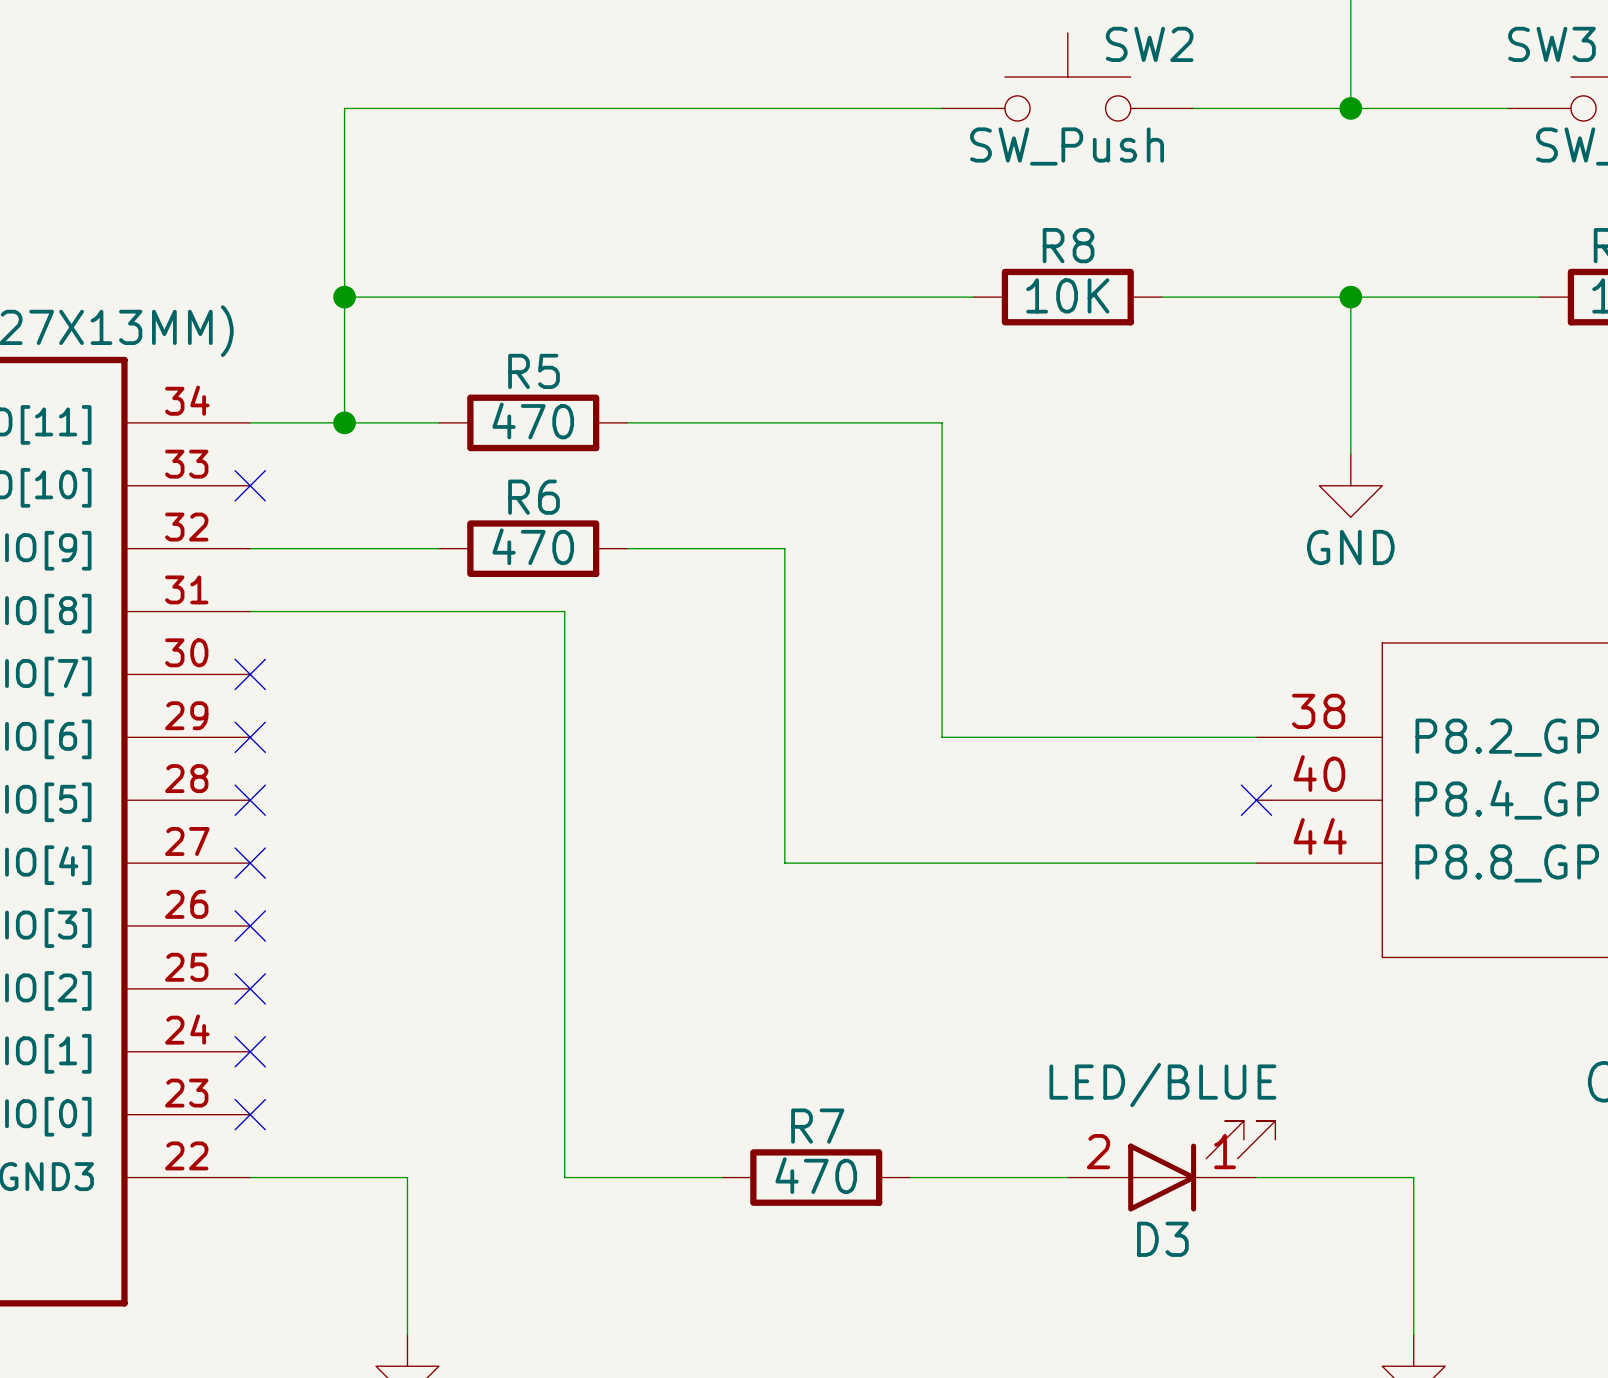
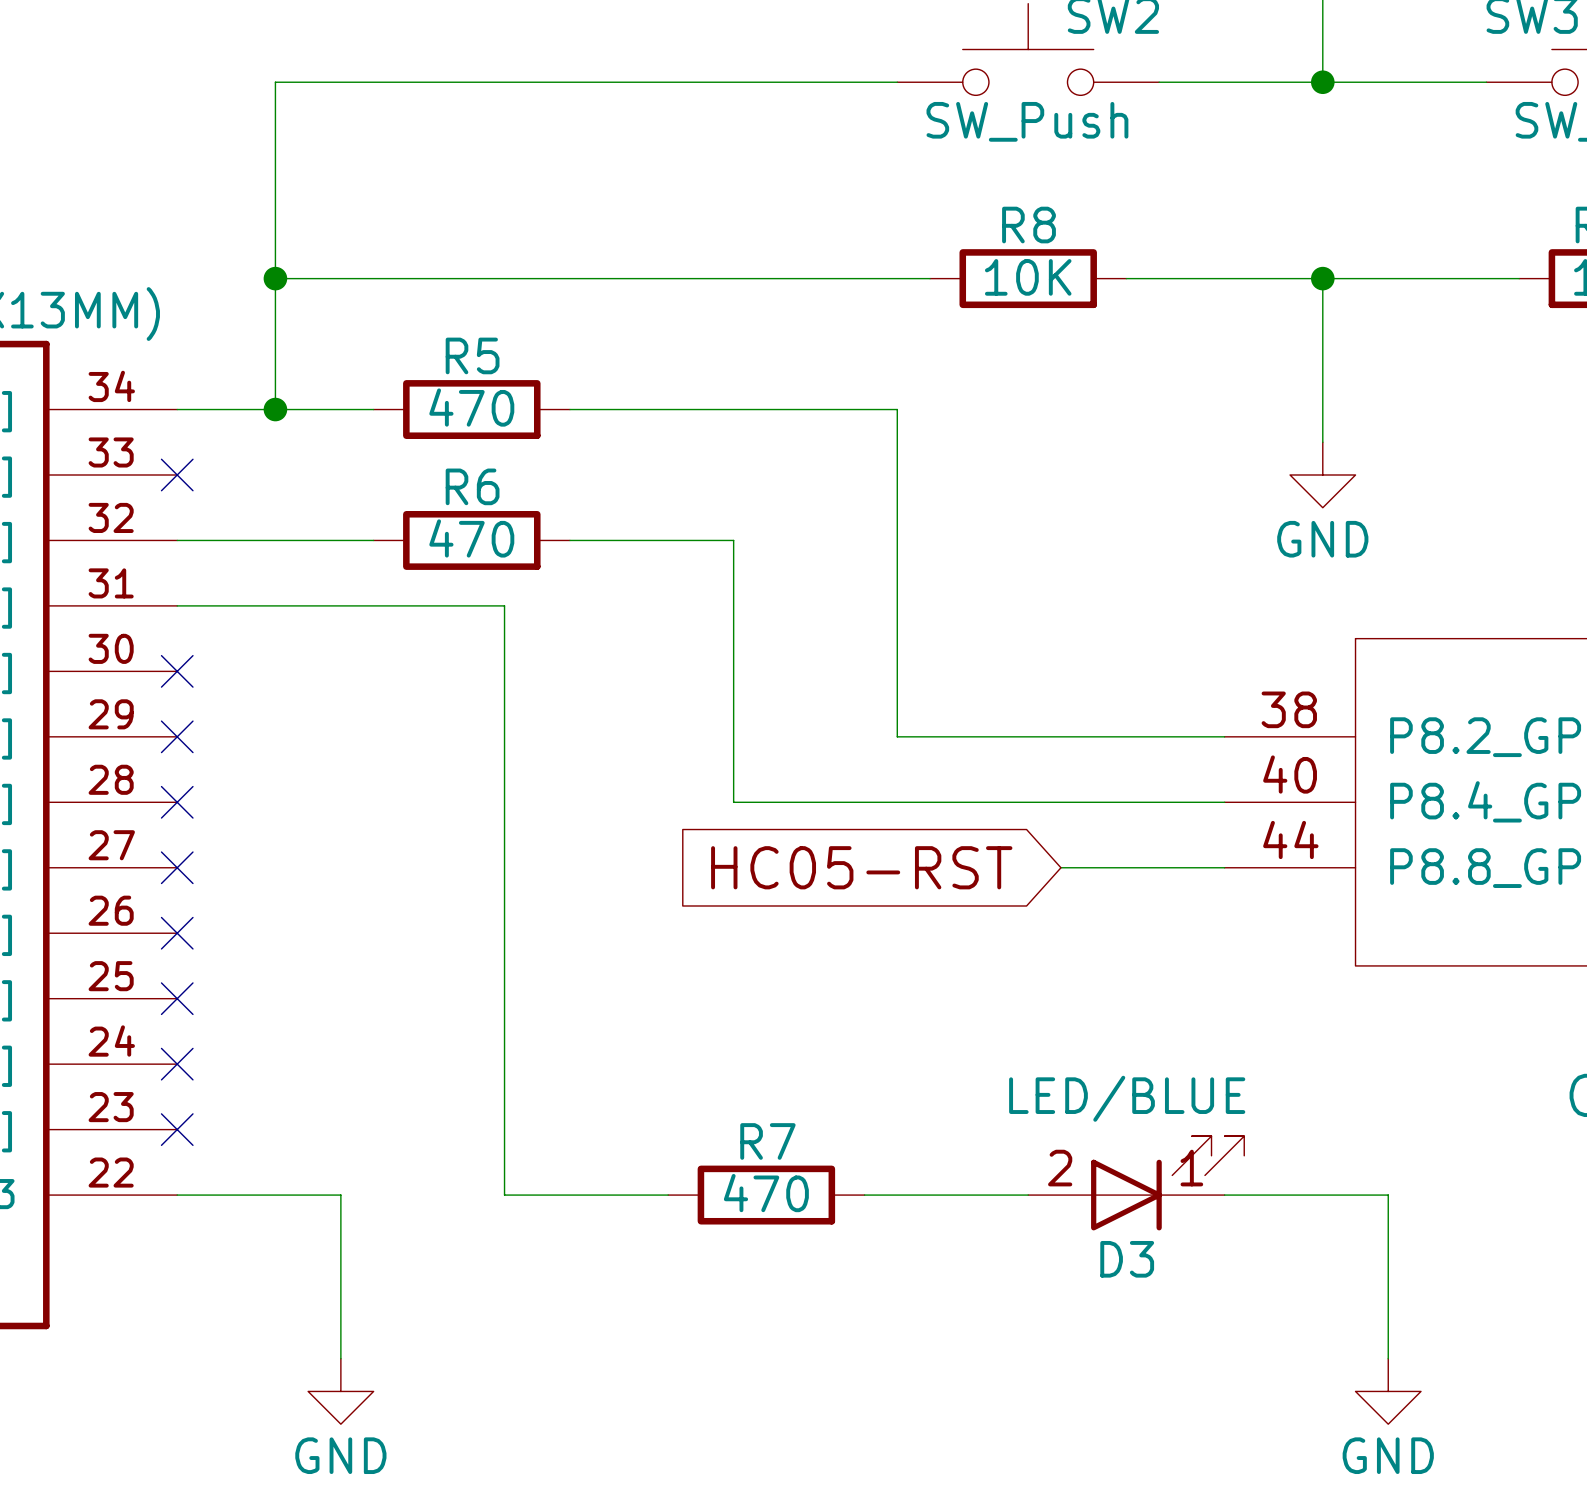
wire: (784, 800) (784, 863) (1099, 863) -> (733, 802) (1224, 802)
no-connect mark: (1256, 800) -> none
global label: none -> HC05-RST (861, 867)

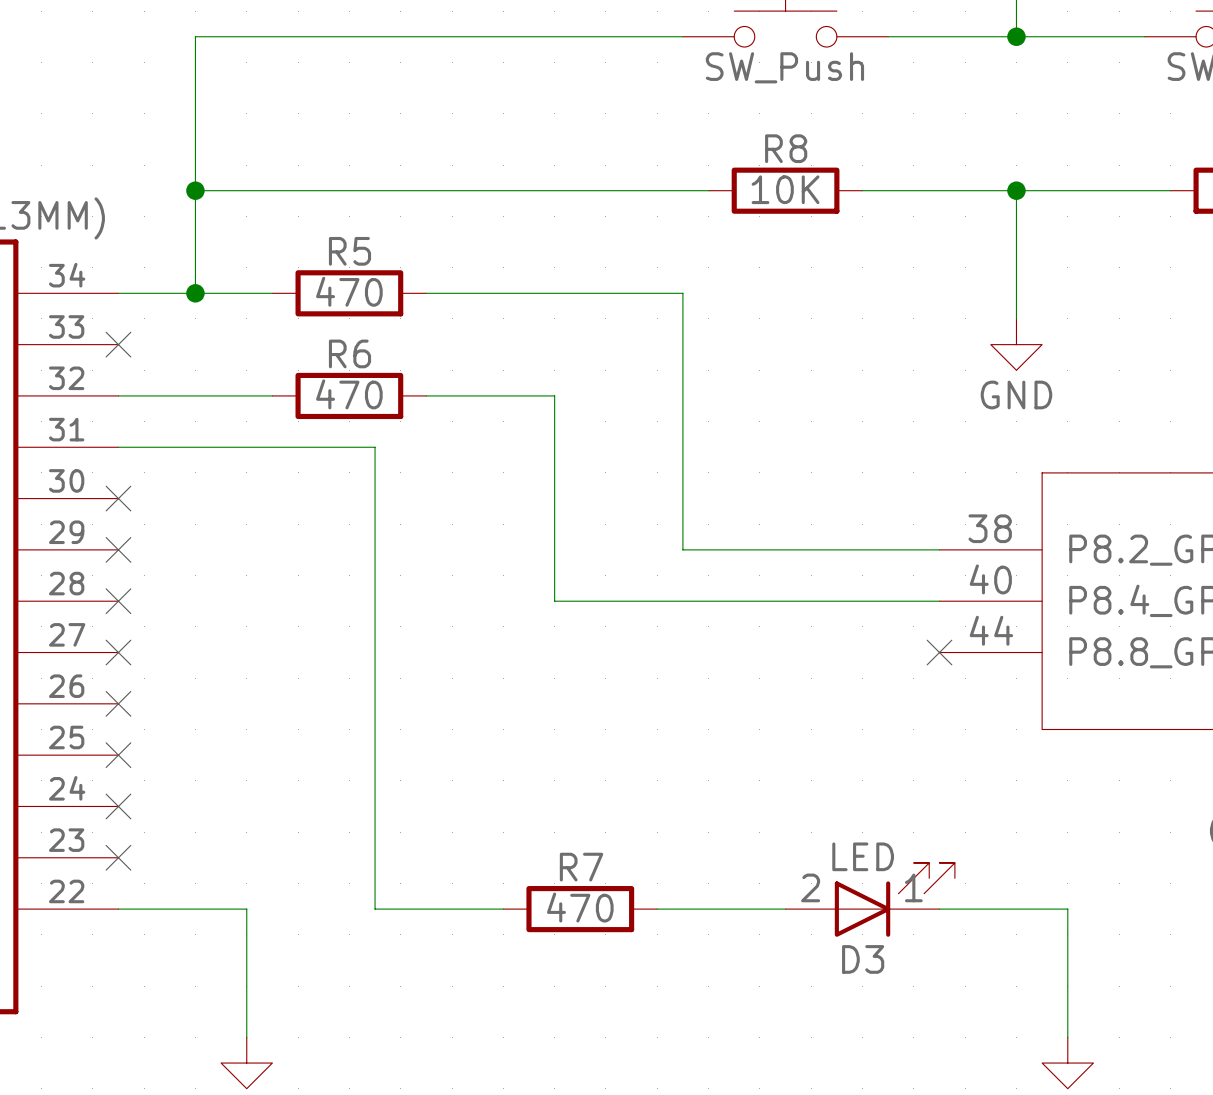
global label: HC05-RST (861, 867) -> none
wire: (1060, 867) (1224, 867) -> none
no-connect mark: none -> (939, 652)
D3 value: LED/BLUE (1127, 1098) -> LED (863, 856)

